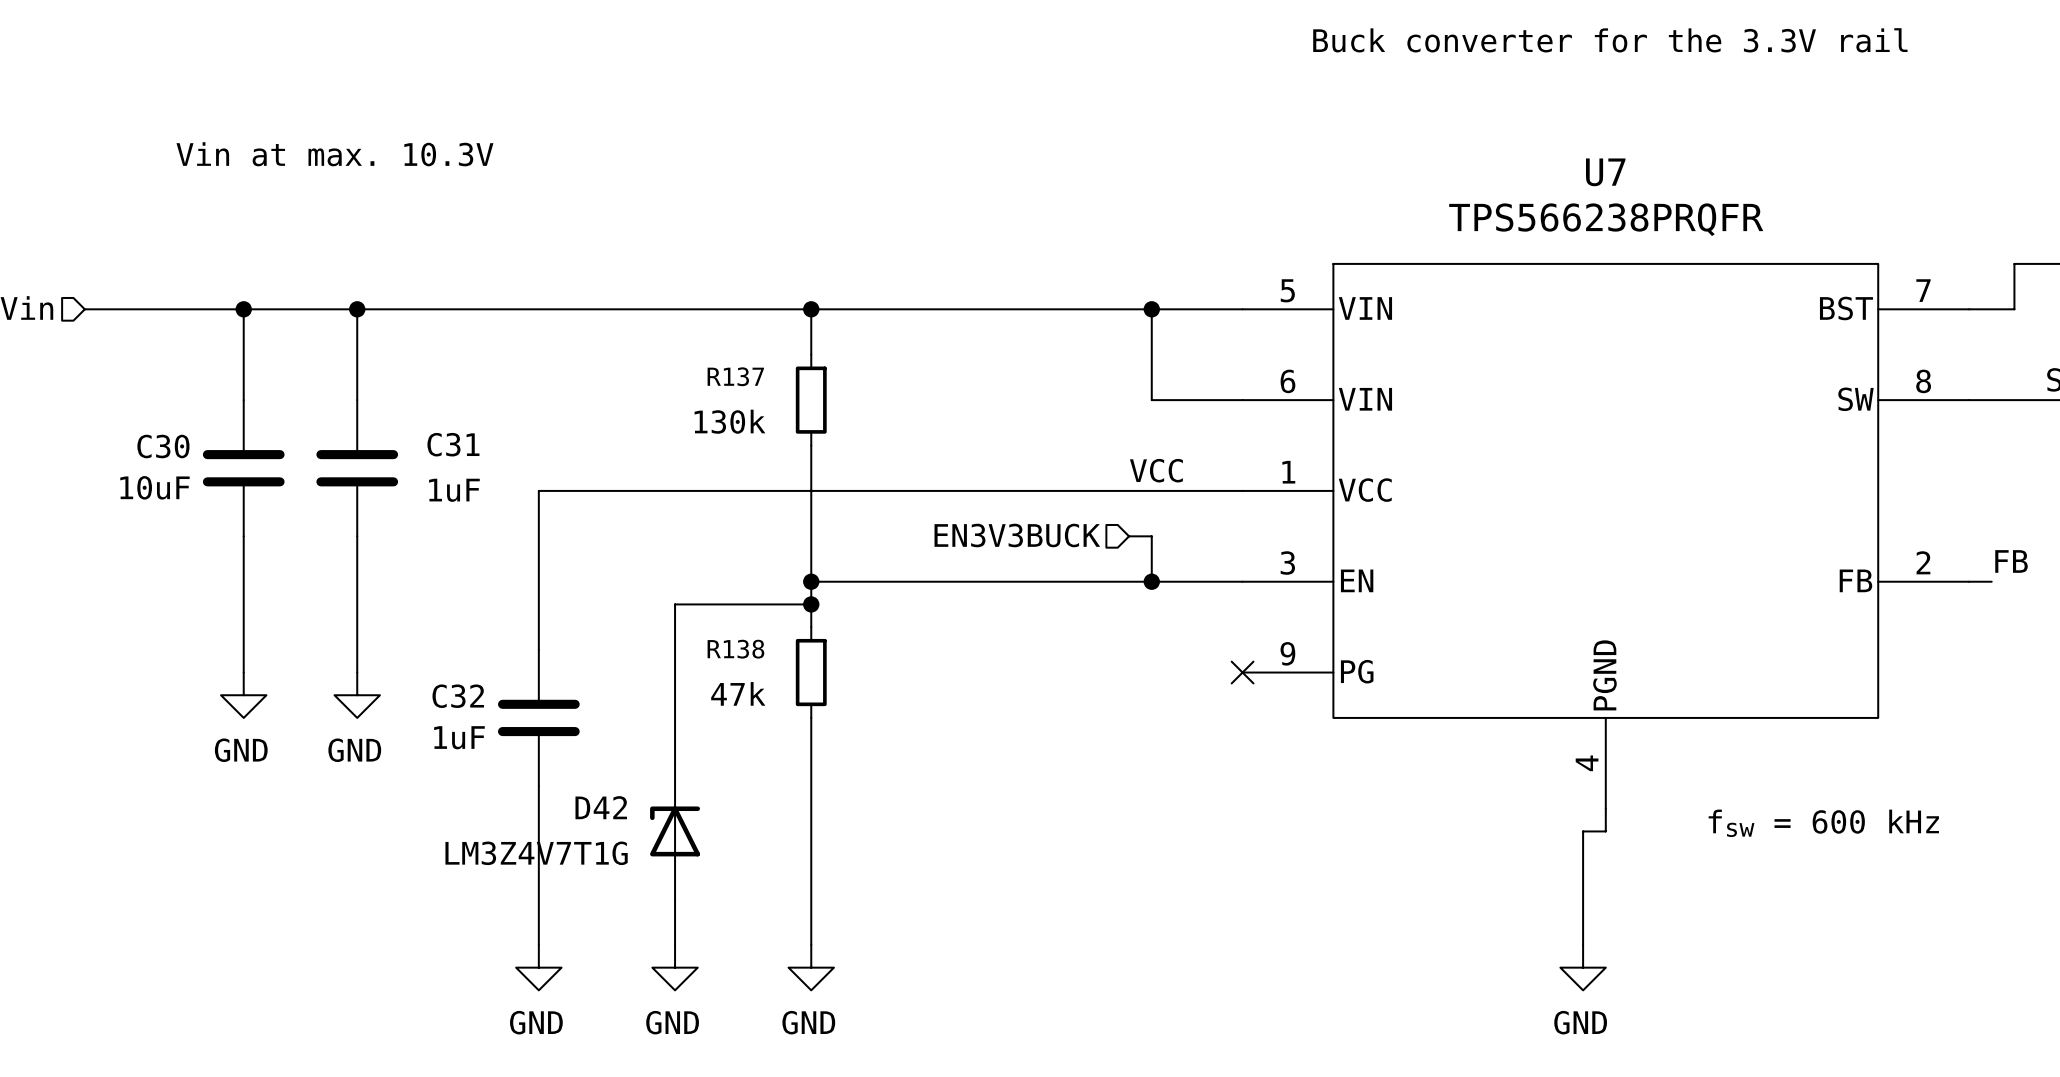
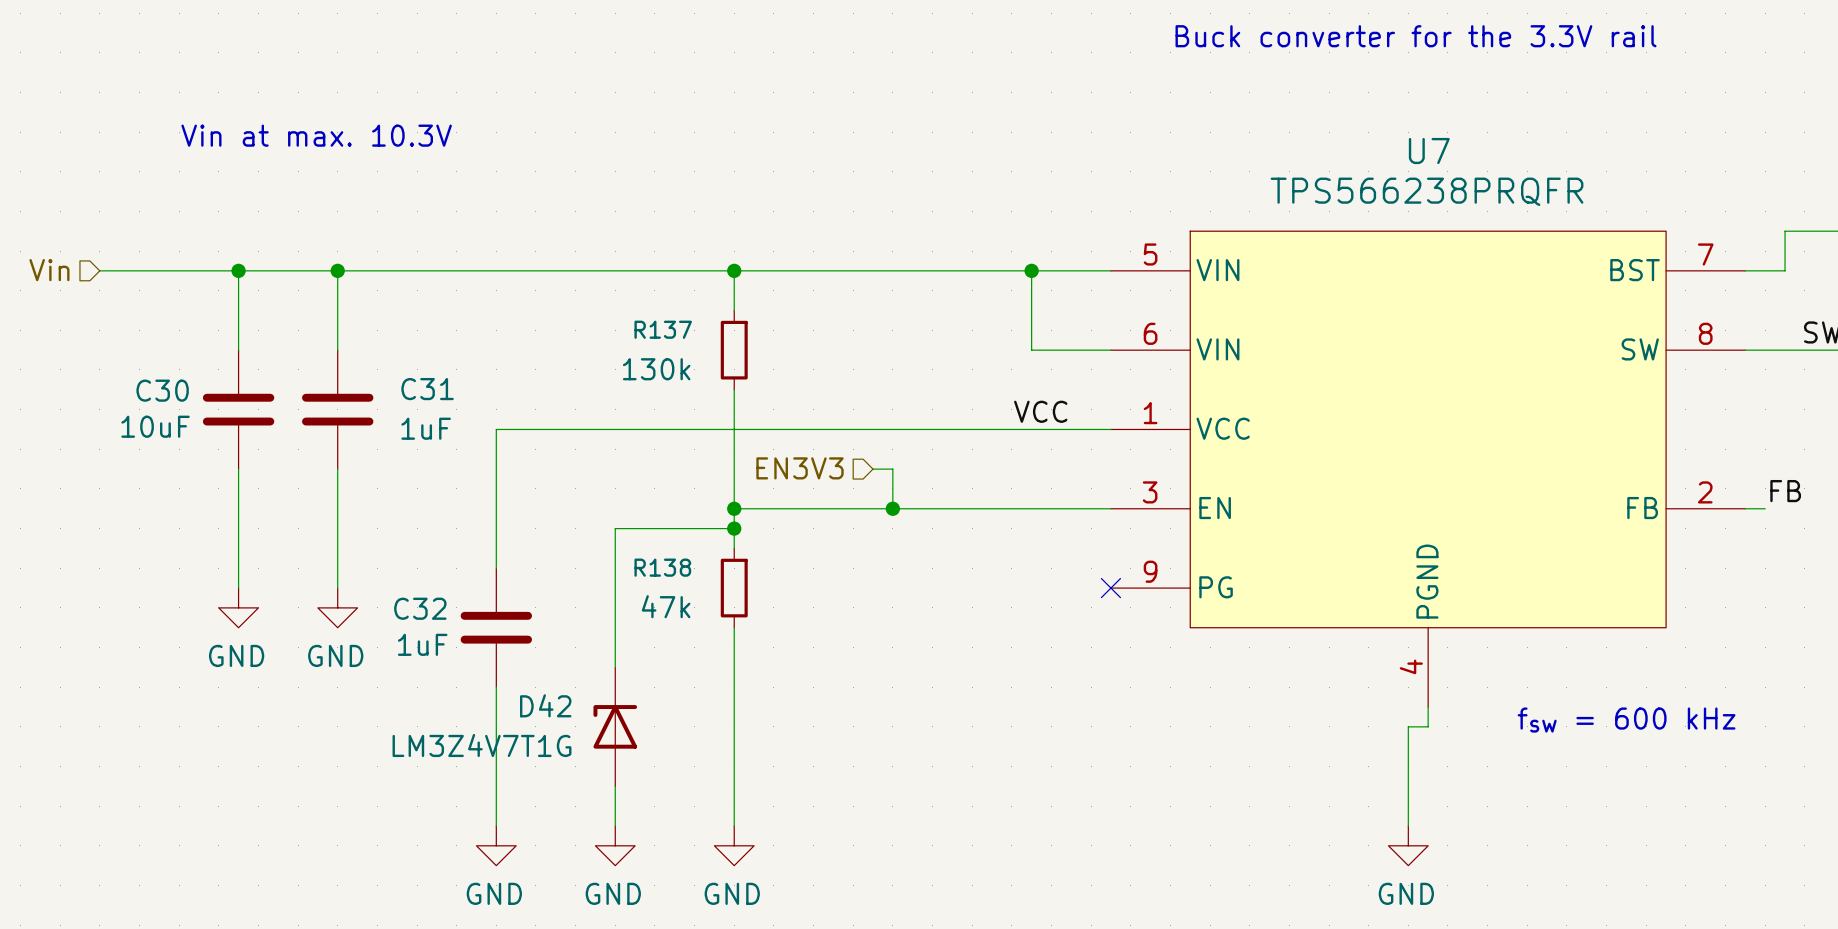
hierarchical label: EN3V3BUCK (1017, 535) -> EN3V3 (800, 468)
wire: (1129, 536) (1151, 536) (1151, 581) -> (873, 469) (892, 469) (892, 508)
junction: none -> (892, 508)
junction: (1151, 581) -> none

